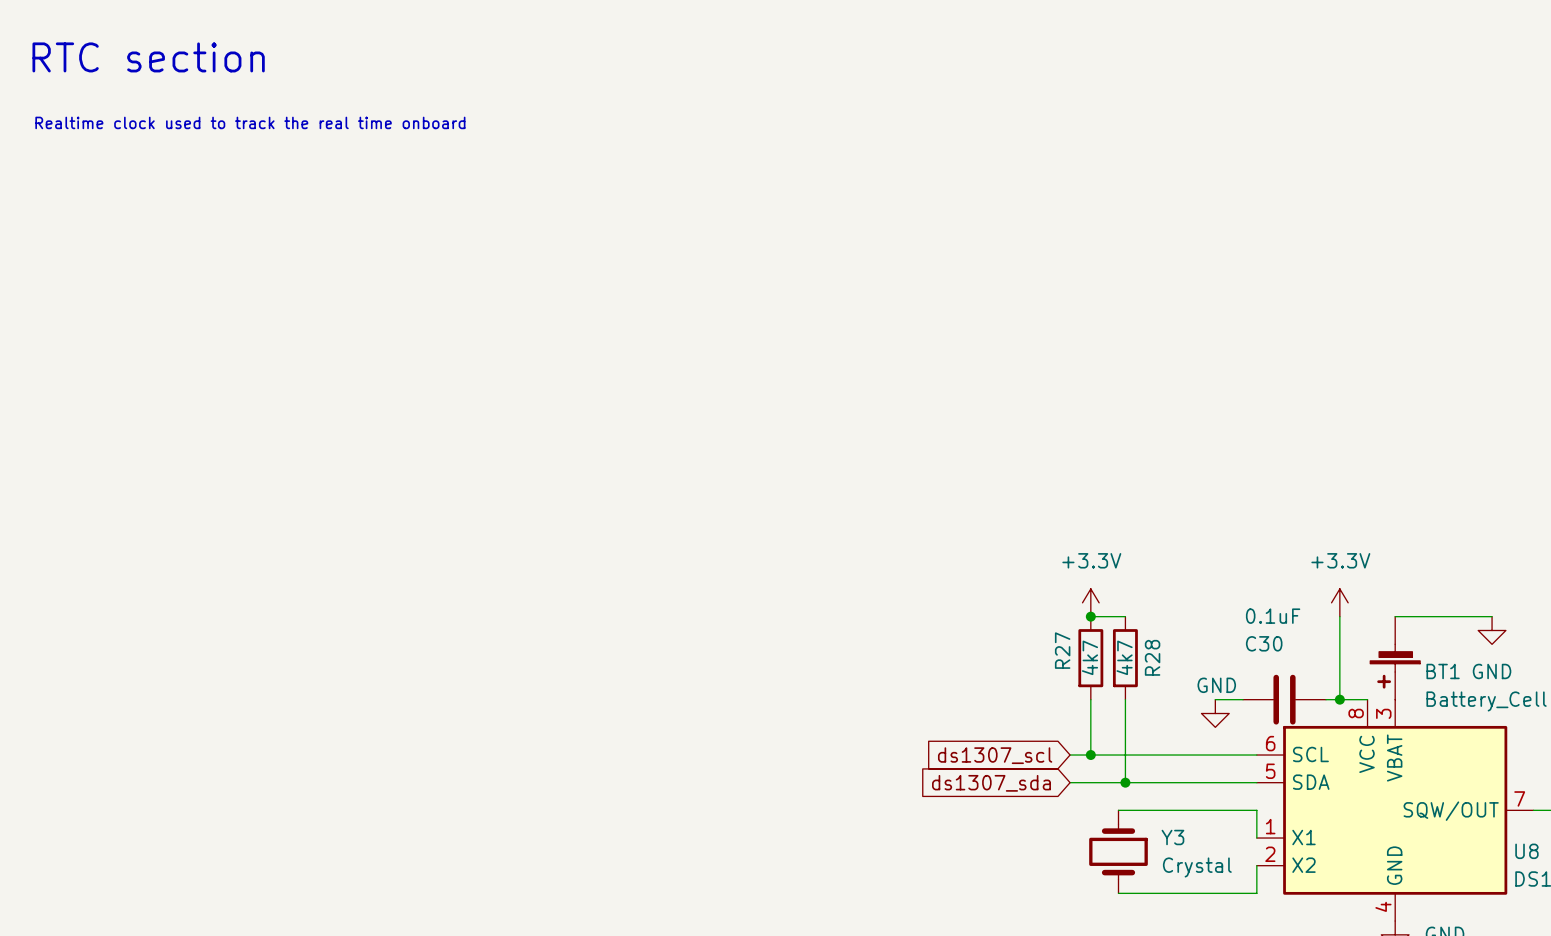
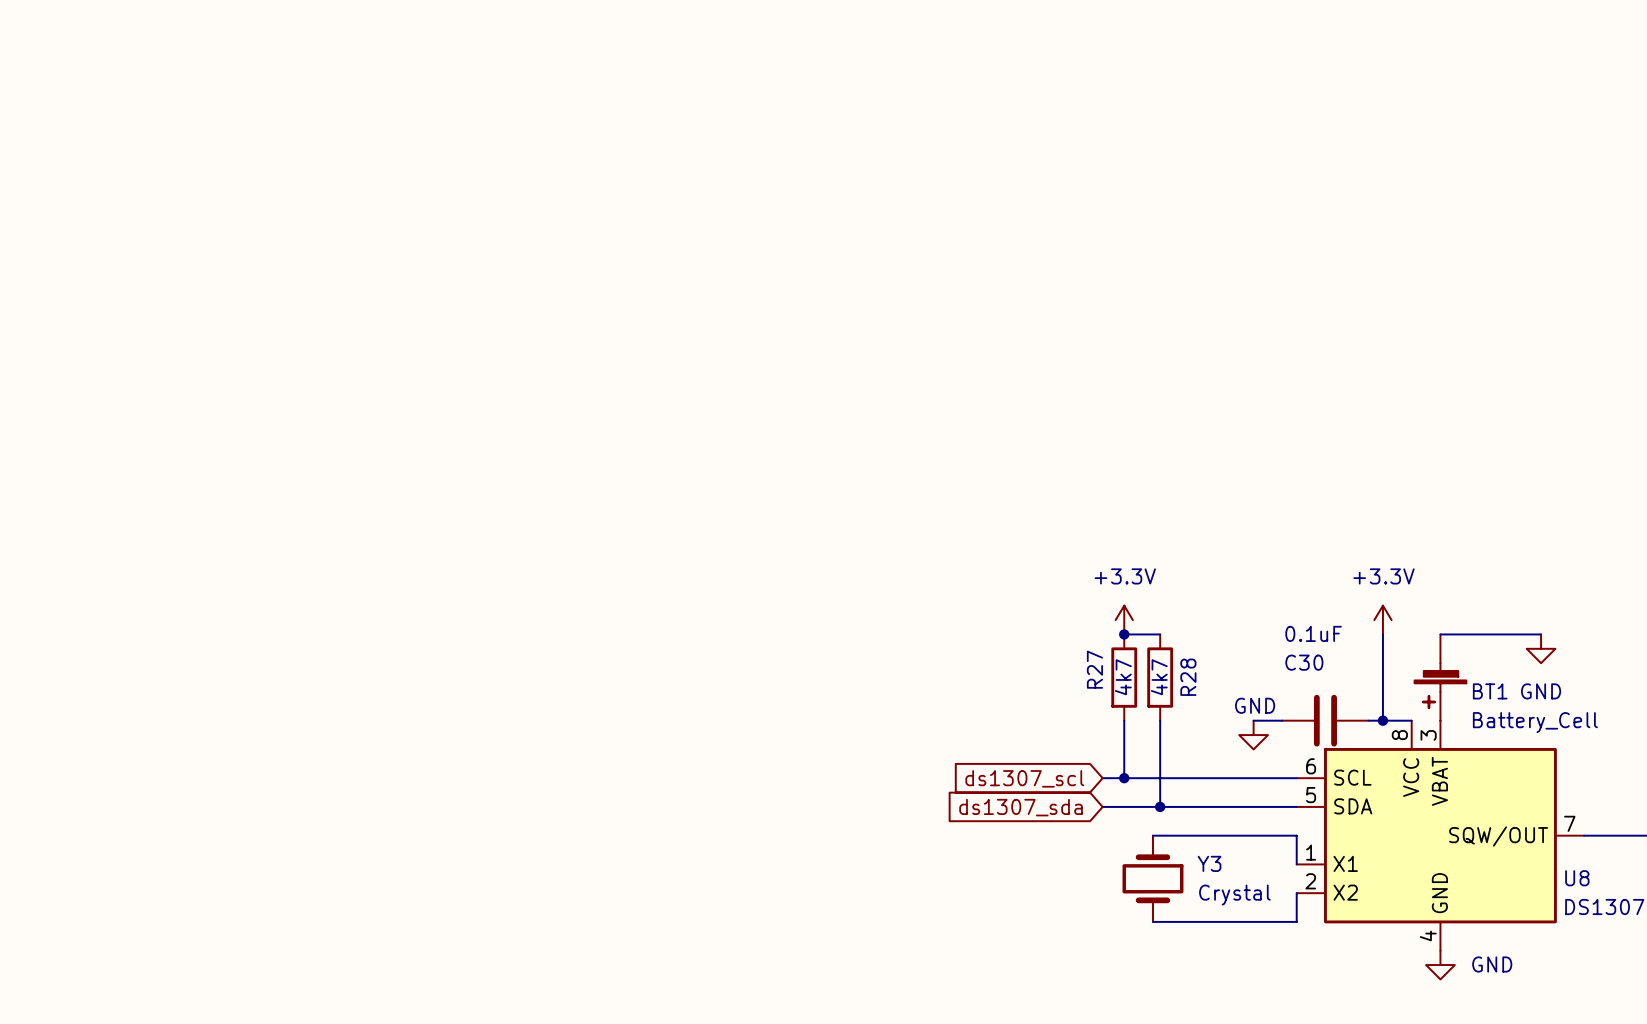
text: RTC section (148, 57) -> none
text: Realtime clock used to track the real time onboard (250, 122) -> none

